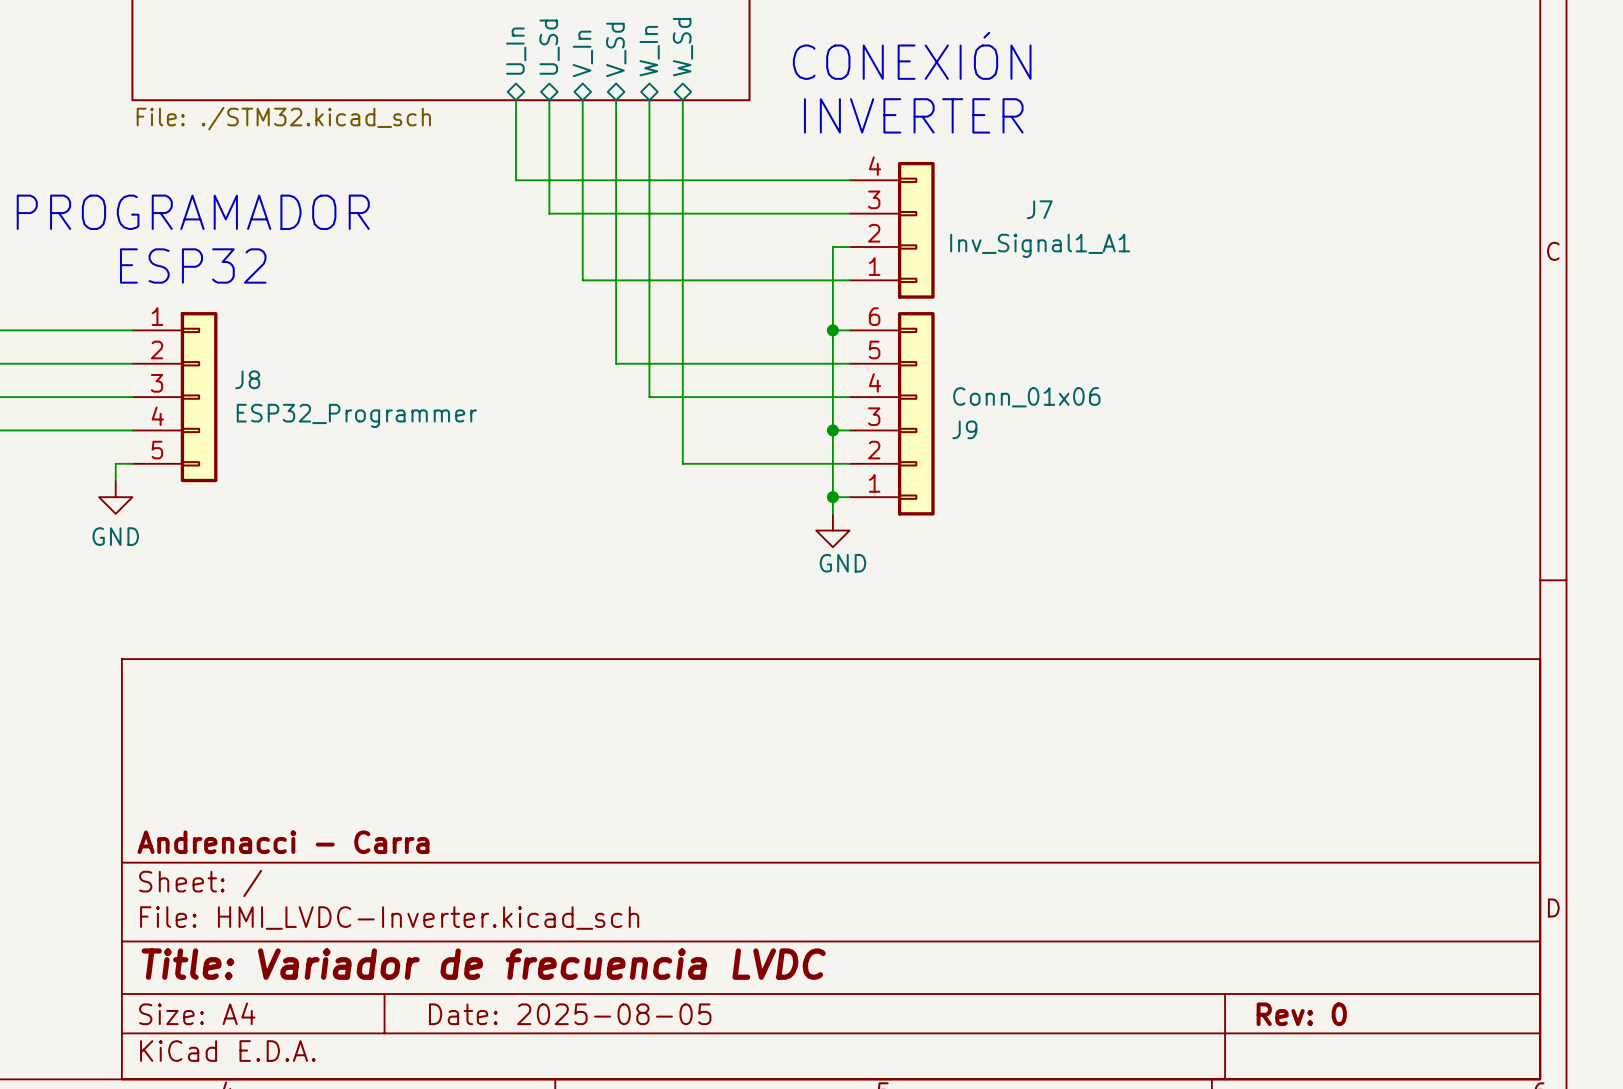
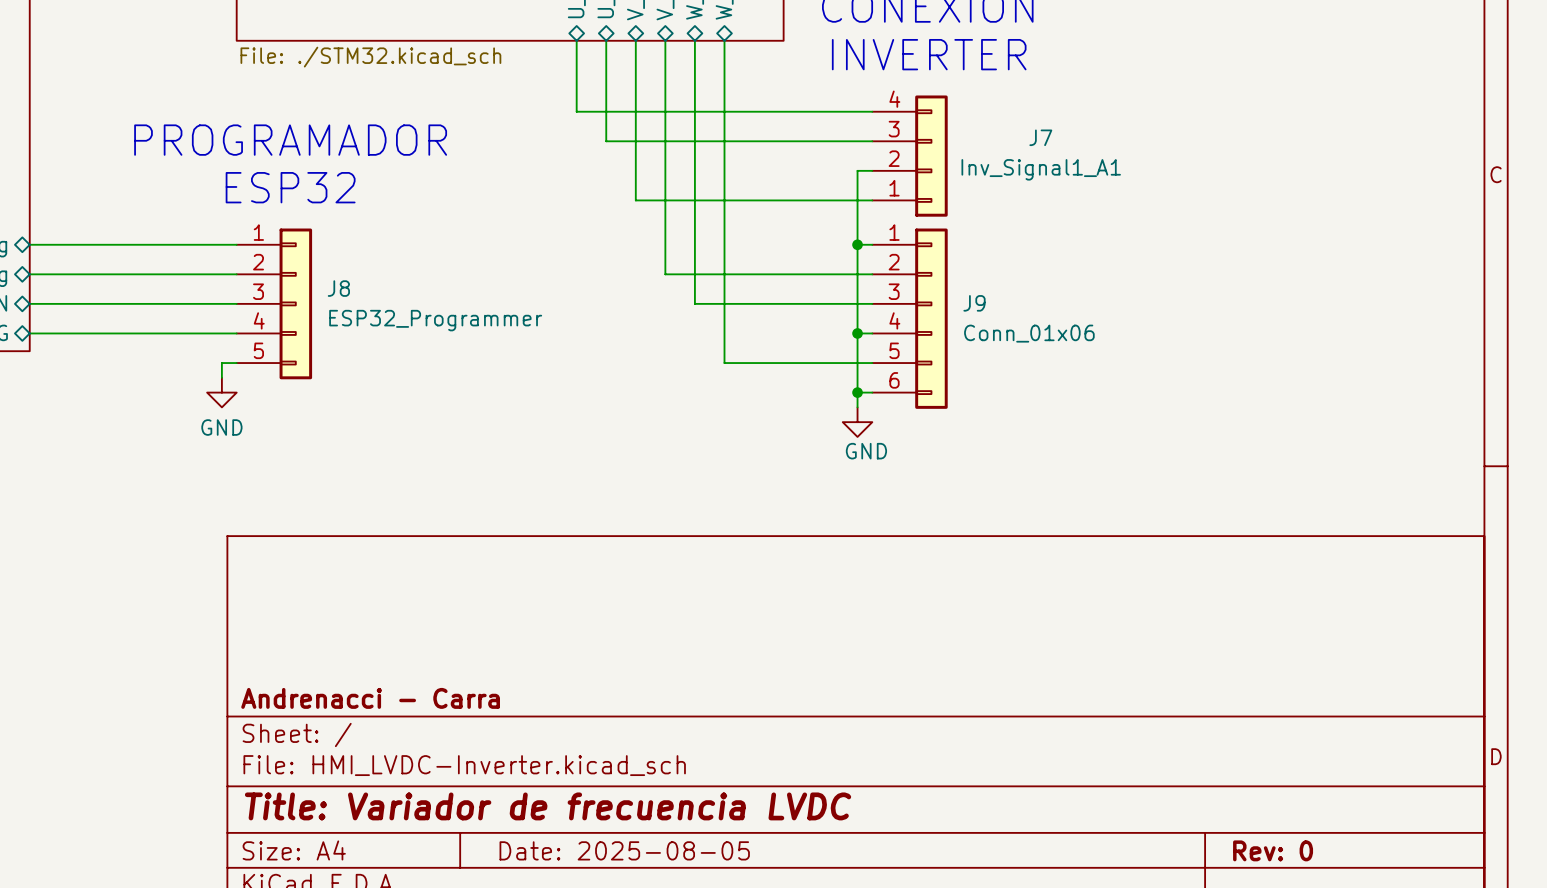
J9 flip: as is (916, 413) -> up-down (931, 318)

